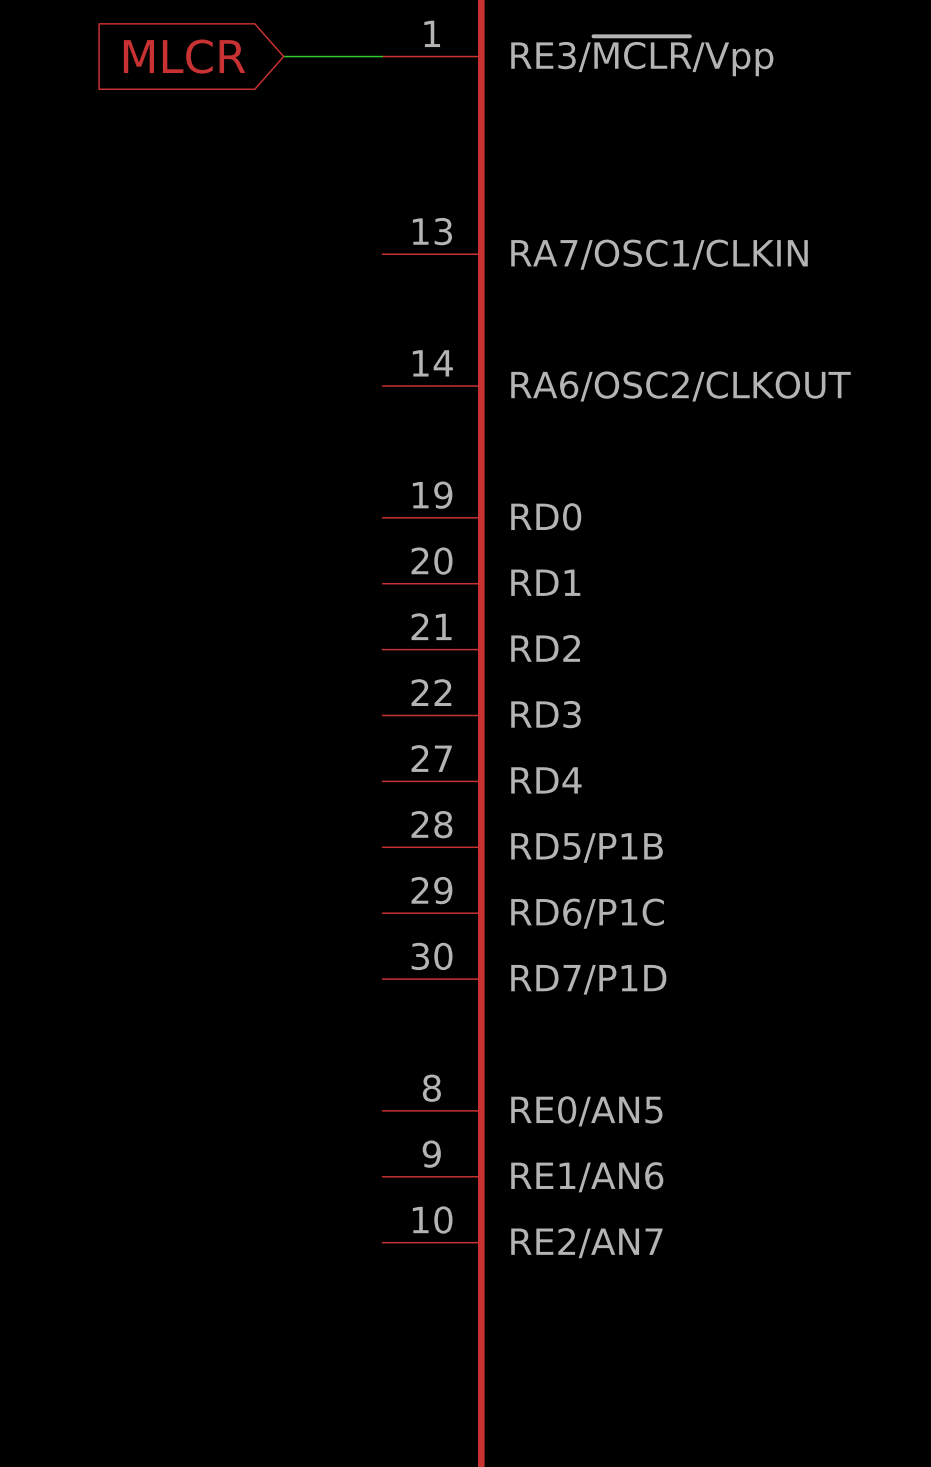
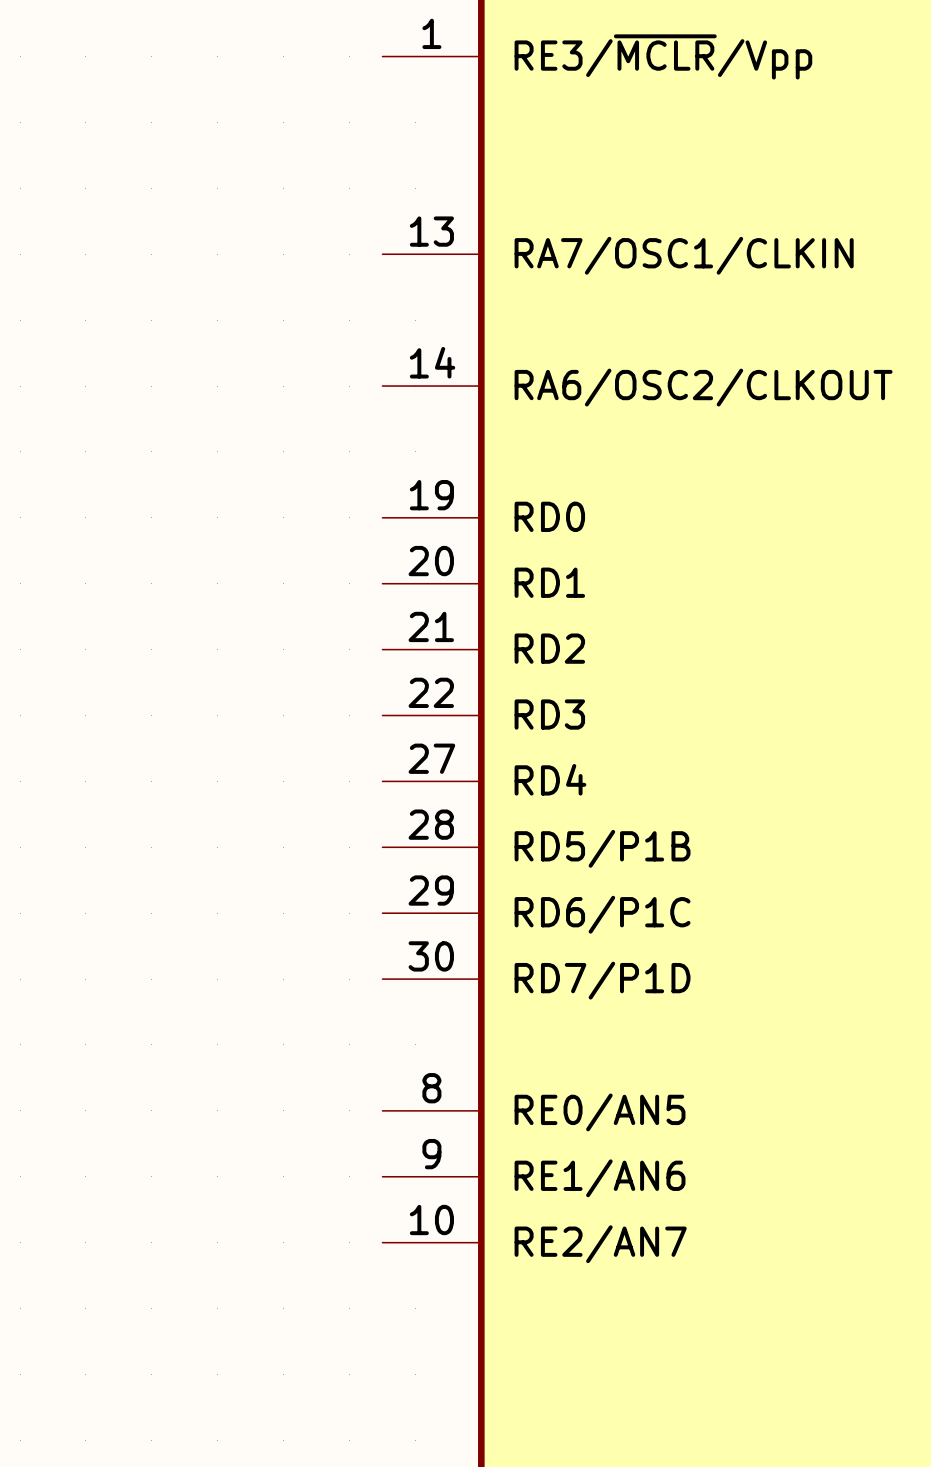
global label: MLCR (184, 56) -> none
wire: (283, 56) (382, 56) -> none

